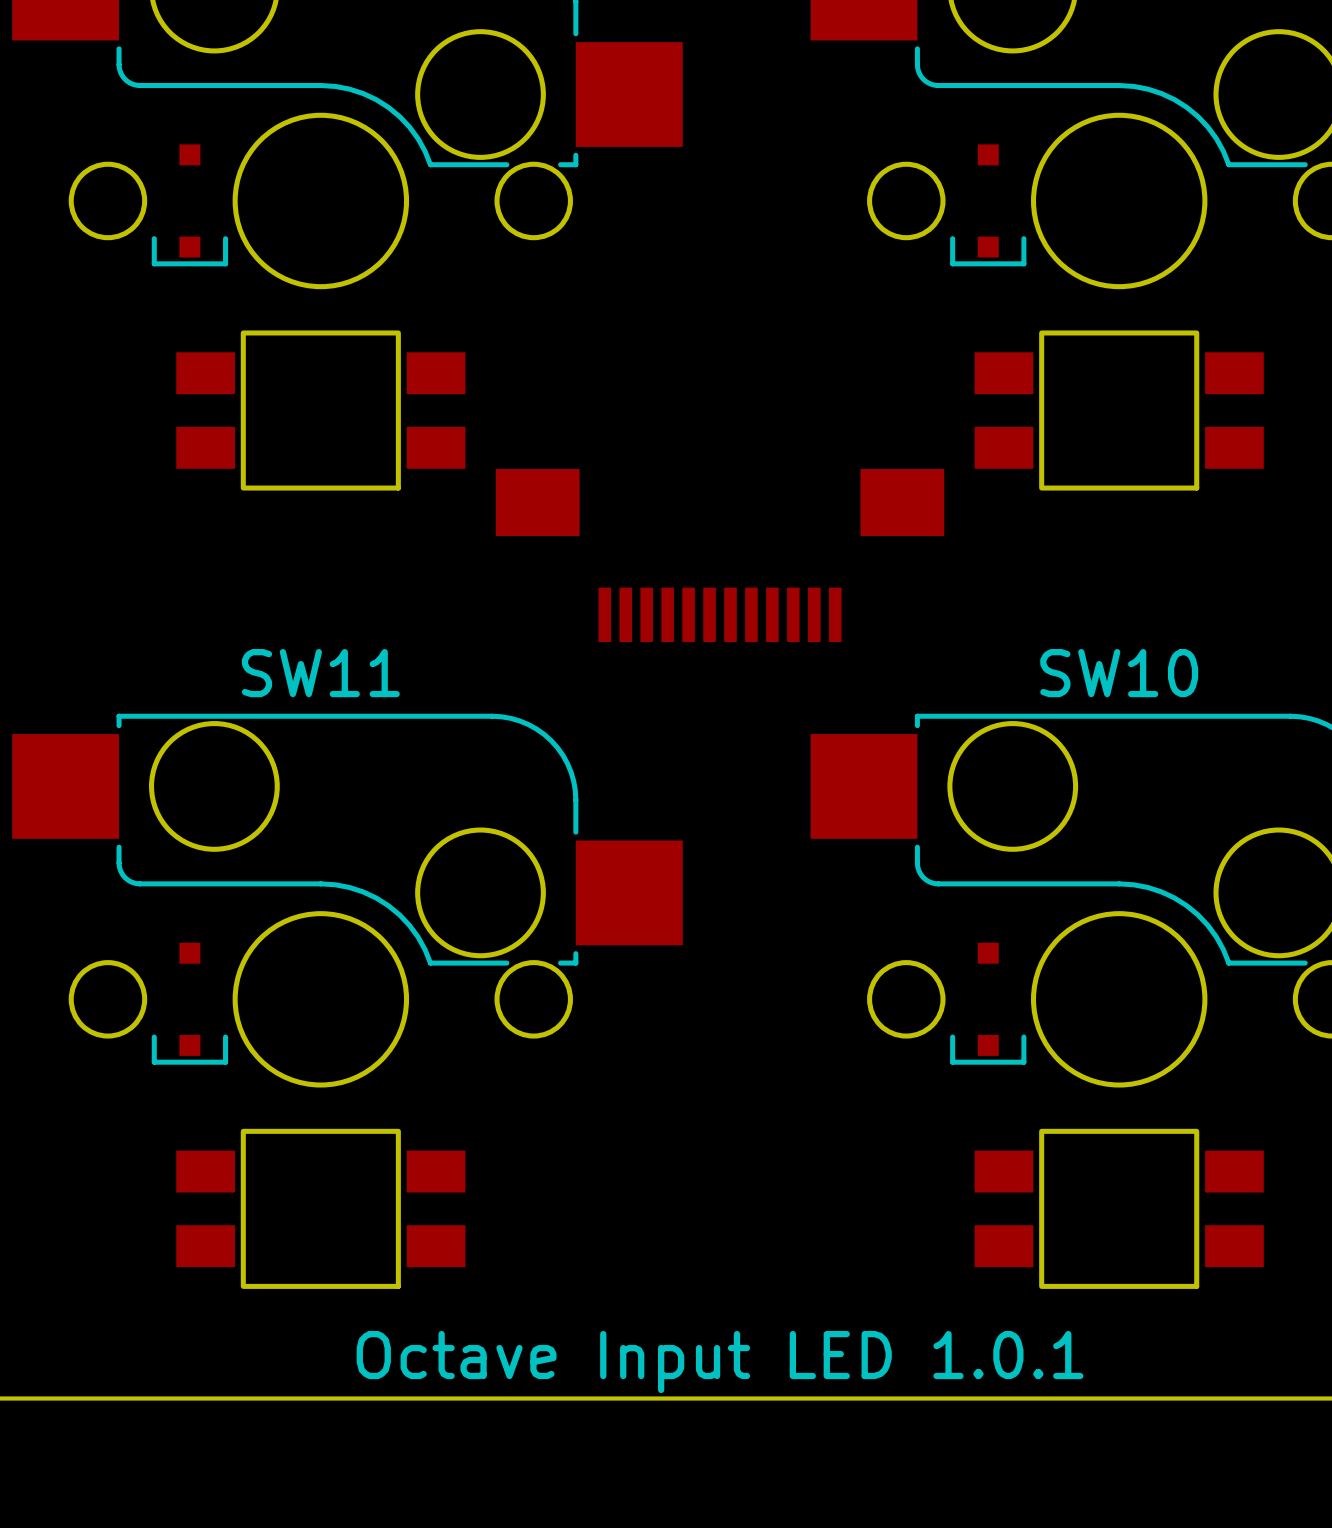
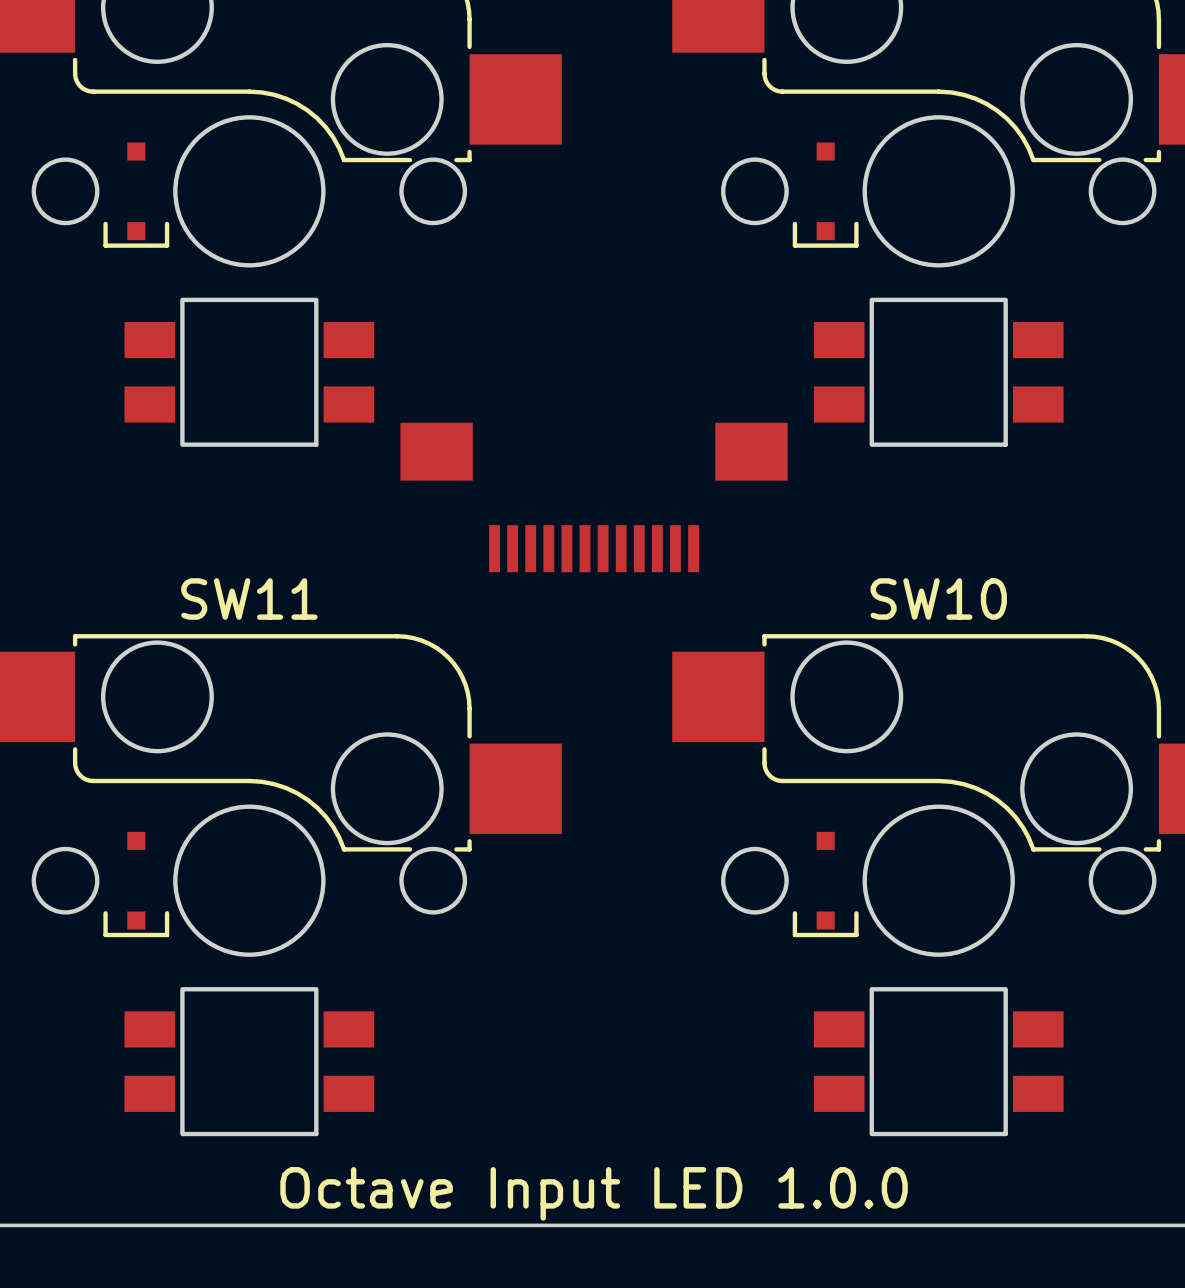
part footprint: [176, 330, 466, 491] -> [124, 297, 375, 447]
part footprint: [974, 330, 1264, 491] -> [813, 297, 1064, 447]
part footprint: [176, 1128, 466, 1289] -> [124, 987, 375, 1137]
part footprint: [974, 1128, 1264, 1289] -> [813, 987, 1064, 1137]
text: Octave Input LED 1.0.1 (720, 1362) -> Octave Input LED 1.0.0 (594, 1193)

